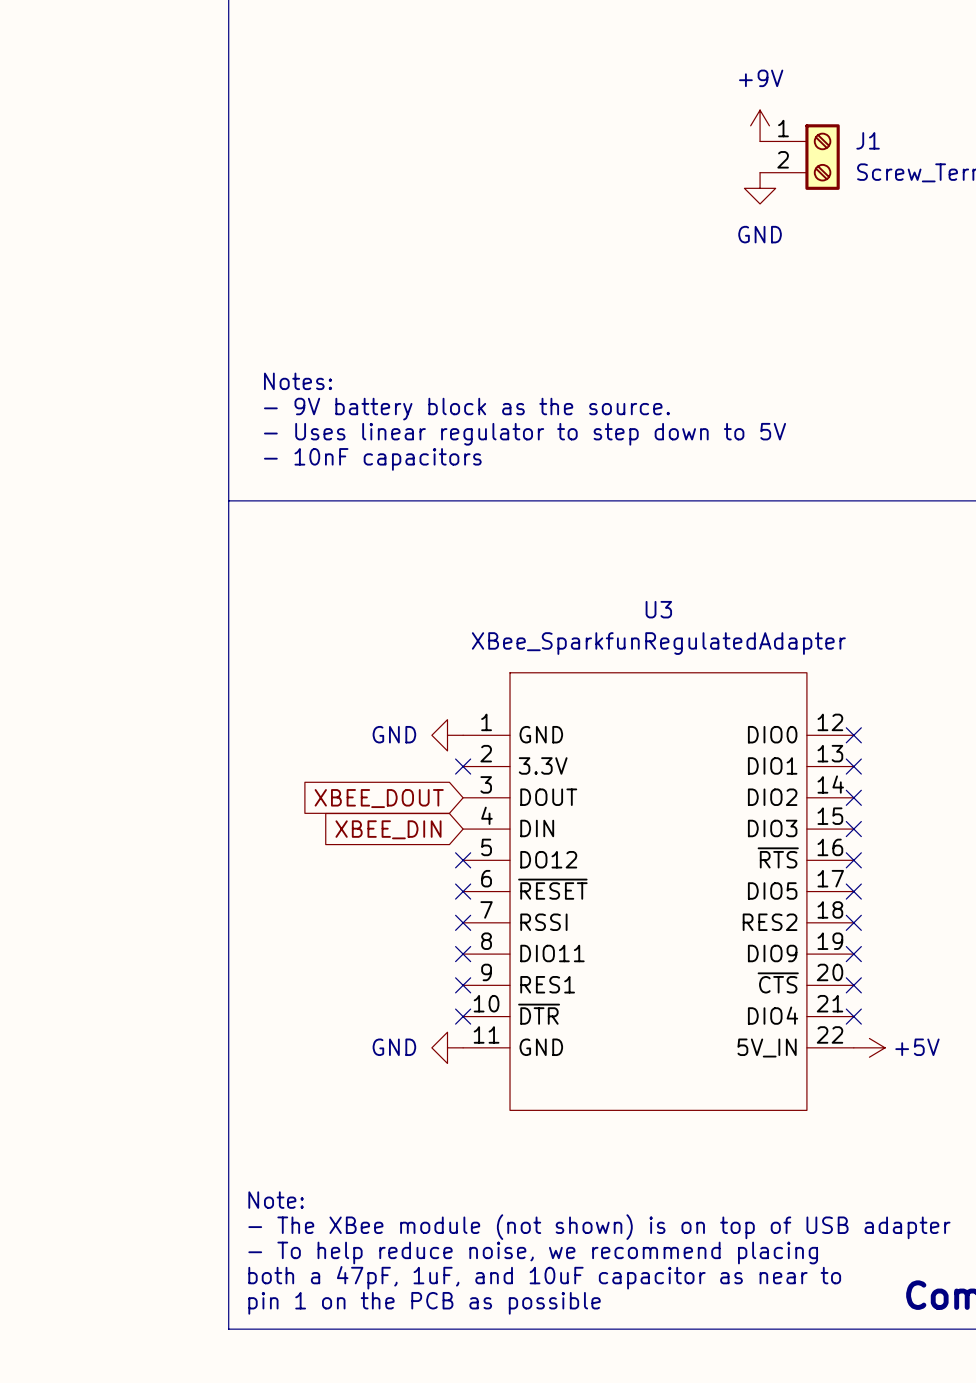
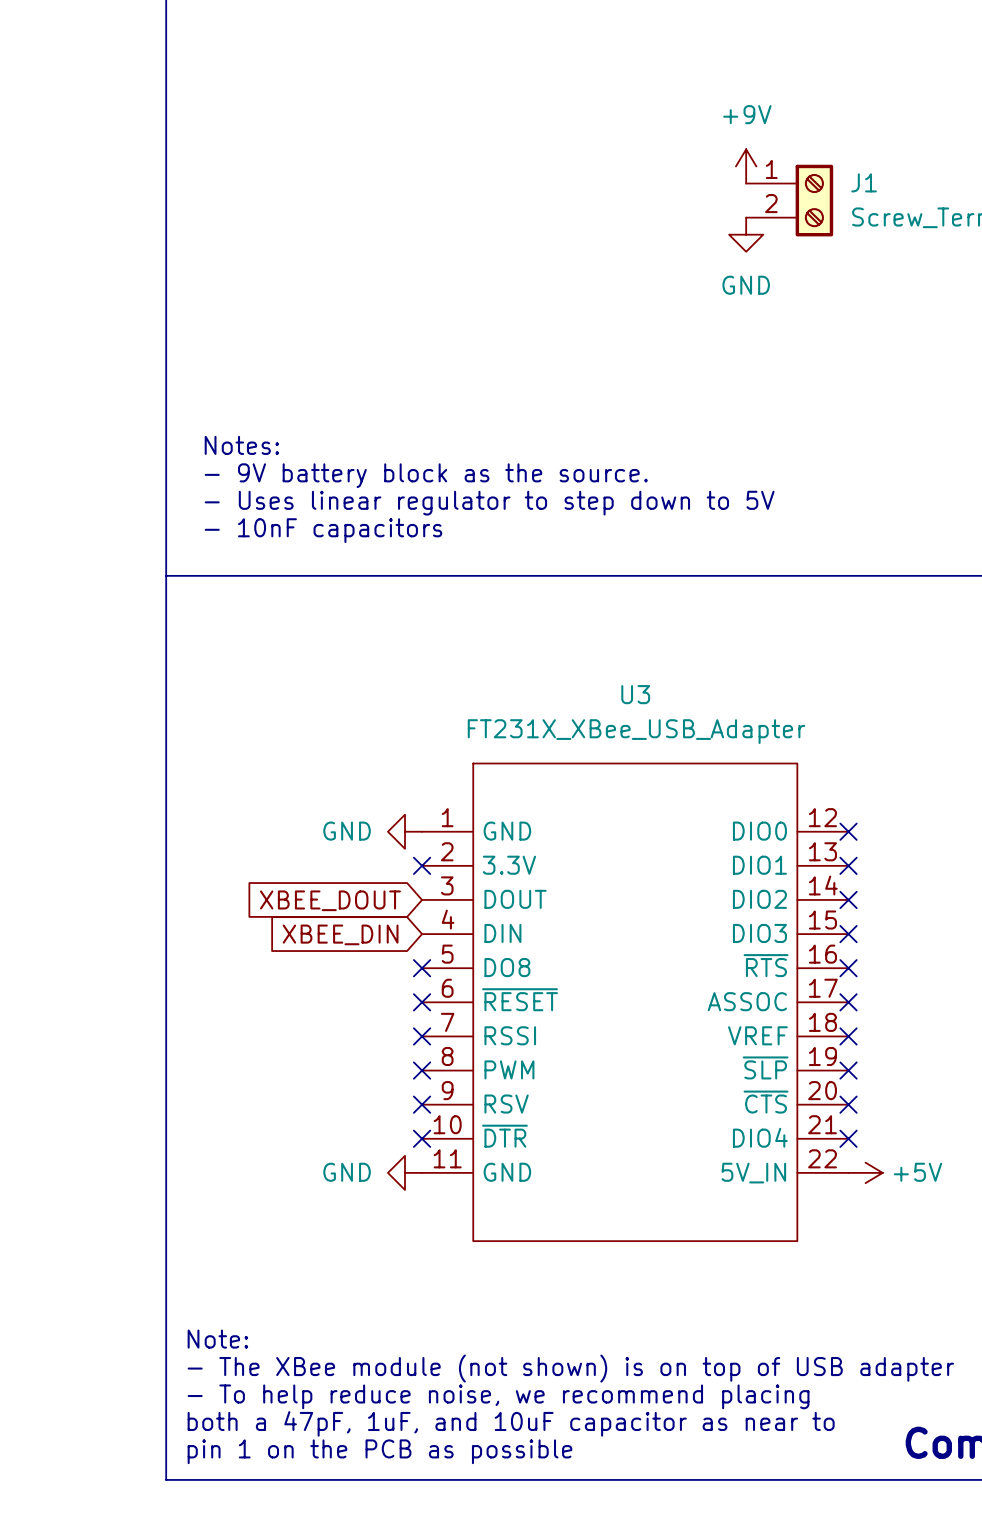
U3 value: XBee_SparkfunRegulatedAdapter (658, 643) -> FT231X_XBee_USB_Adapter (636, 731)
U3 pin name: DO12 (548, 859) -> DO8 (507, 967)
U3 pin name: DIO5 (772, 890) -> ASSOC (747, 1001)
U3 pin name: RES2 (770, 922) -> VREF (757, 1035)
U3 pin name: DIO11 (552, 953) -> PWM (509, 1069)
U3 pin name: DIO9 (772, 953) -> ~{SLP} (765, 1067)
U3 pin name: RES1 (547, 984) -> RSV (506, 1104)

